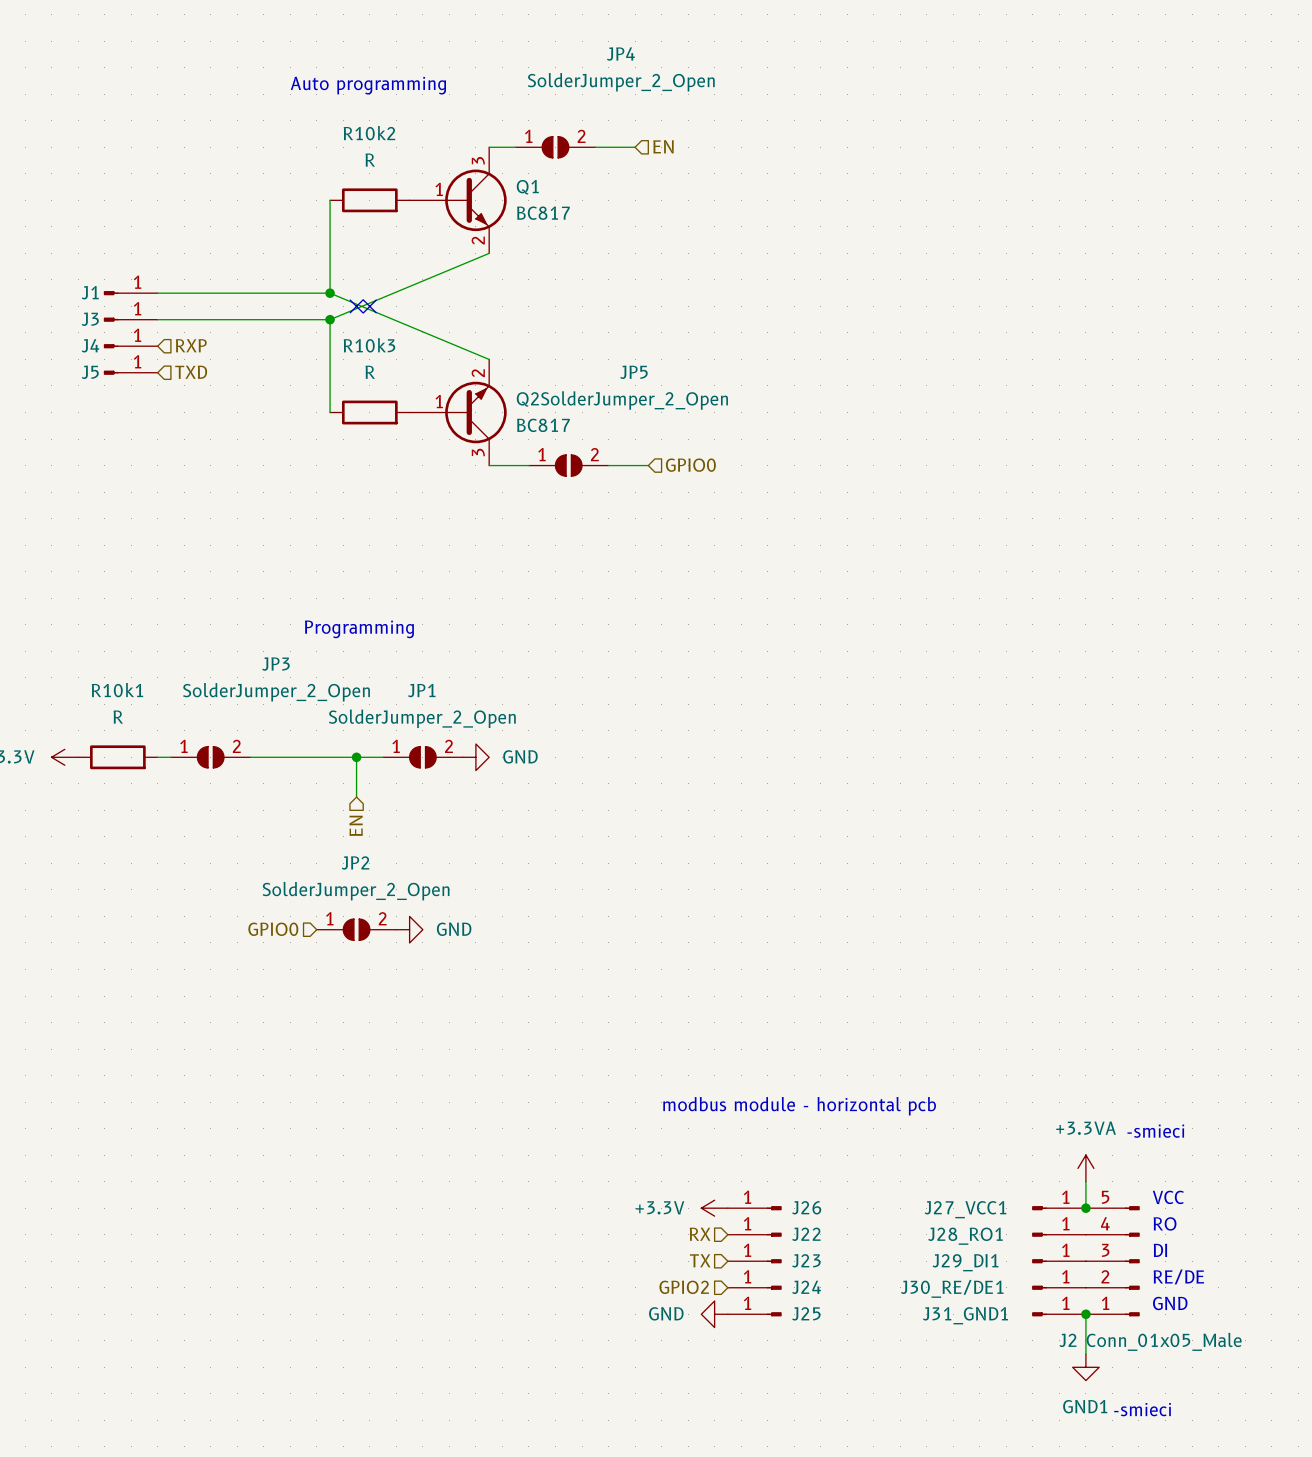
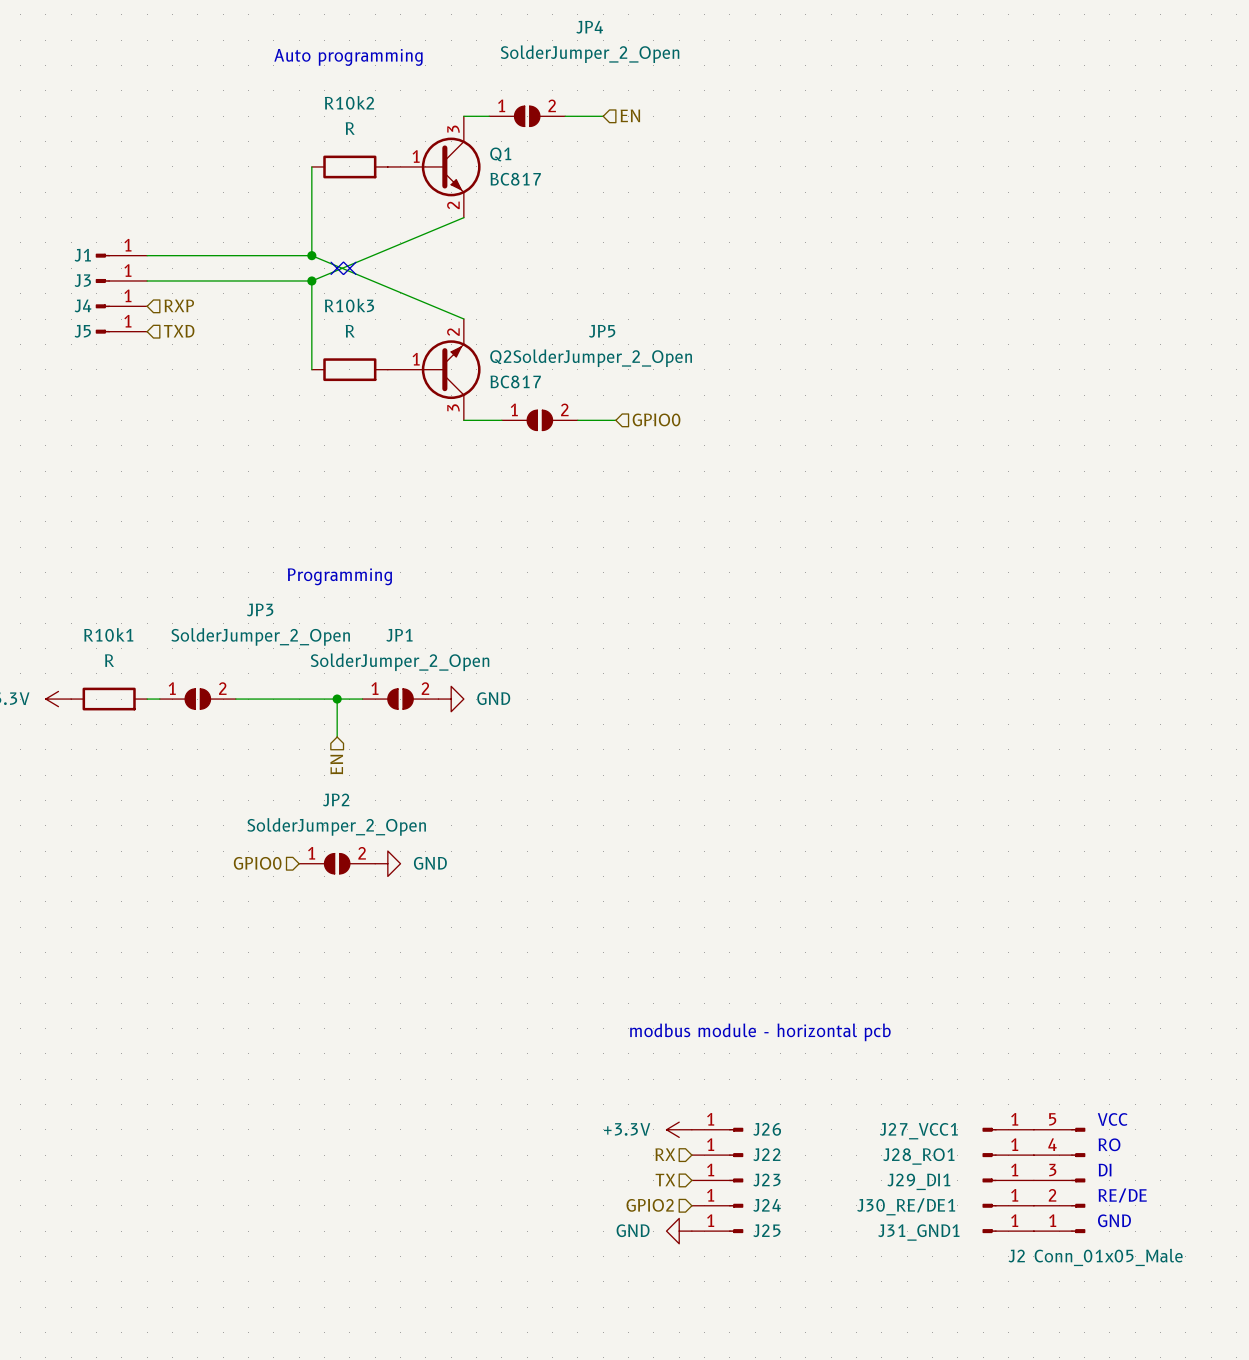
text: -smieci (1155, 1131) -> none
power symbol: +3.3VA (1085, 1168) -> none
wire: (1085, 1181) (1085, 1208) -> none
junction: (1085, 1208) -> none
wire: (1085, 1314) (1085, 1354) -> none
junction: (1085, 1314) -> none
power symbol: GND1 (1085, 1367) -> none
text: -smieci (1142, 1409) -> none

